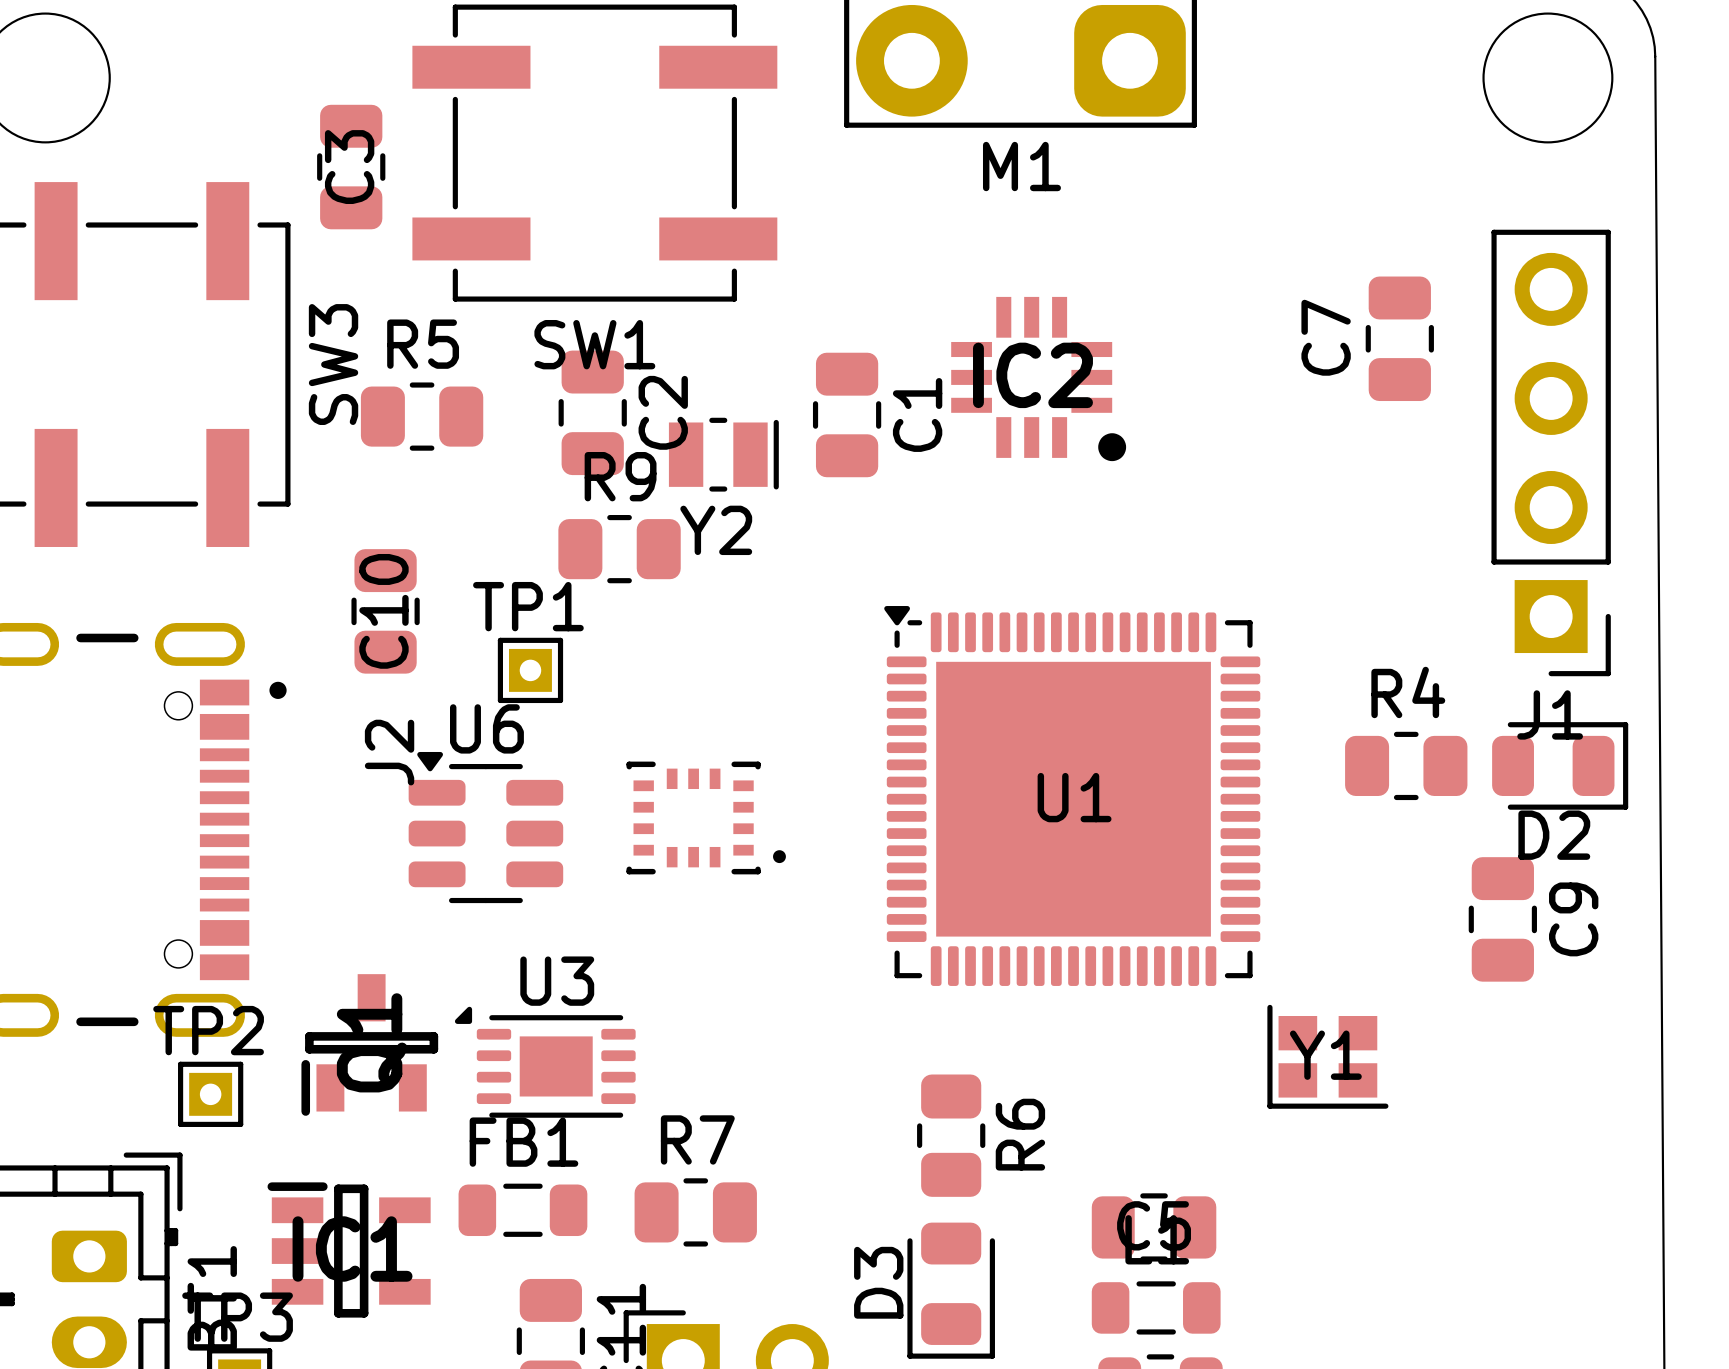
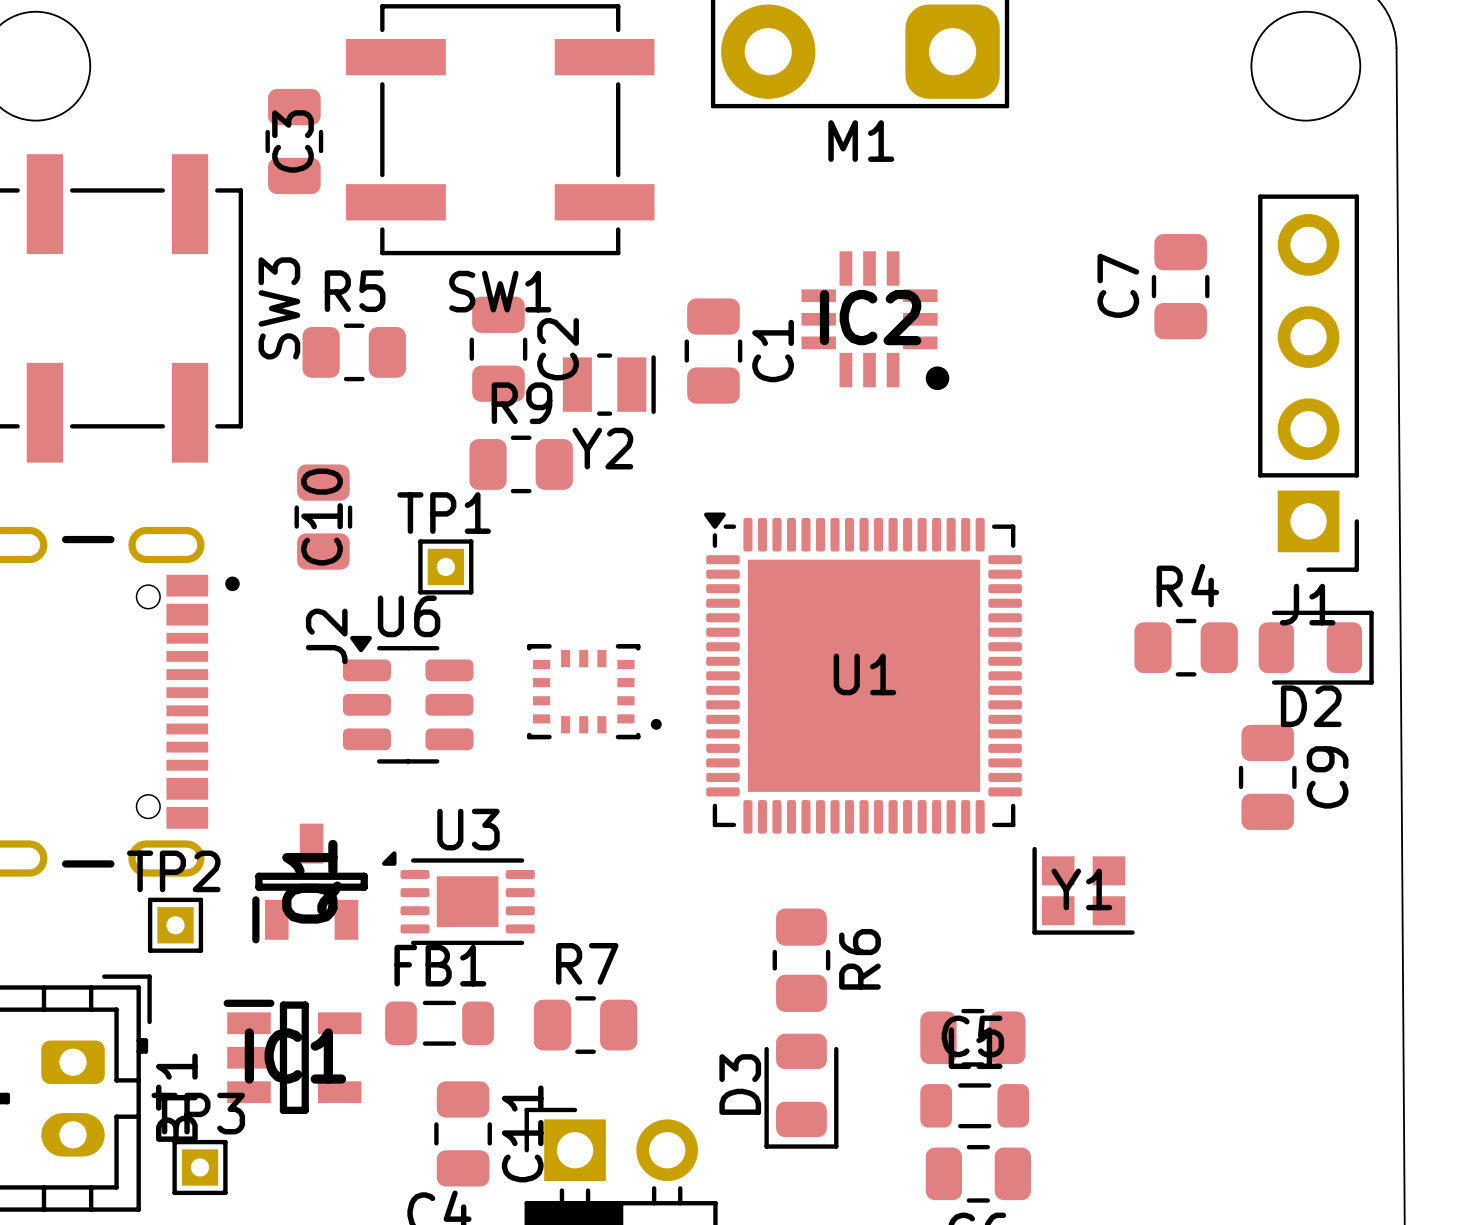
U1 position: (1072, 795) -> (862, 673)
Y1 position: (1327, 1056) -> (1083, 890)

